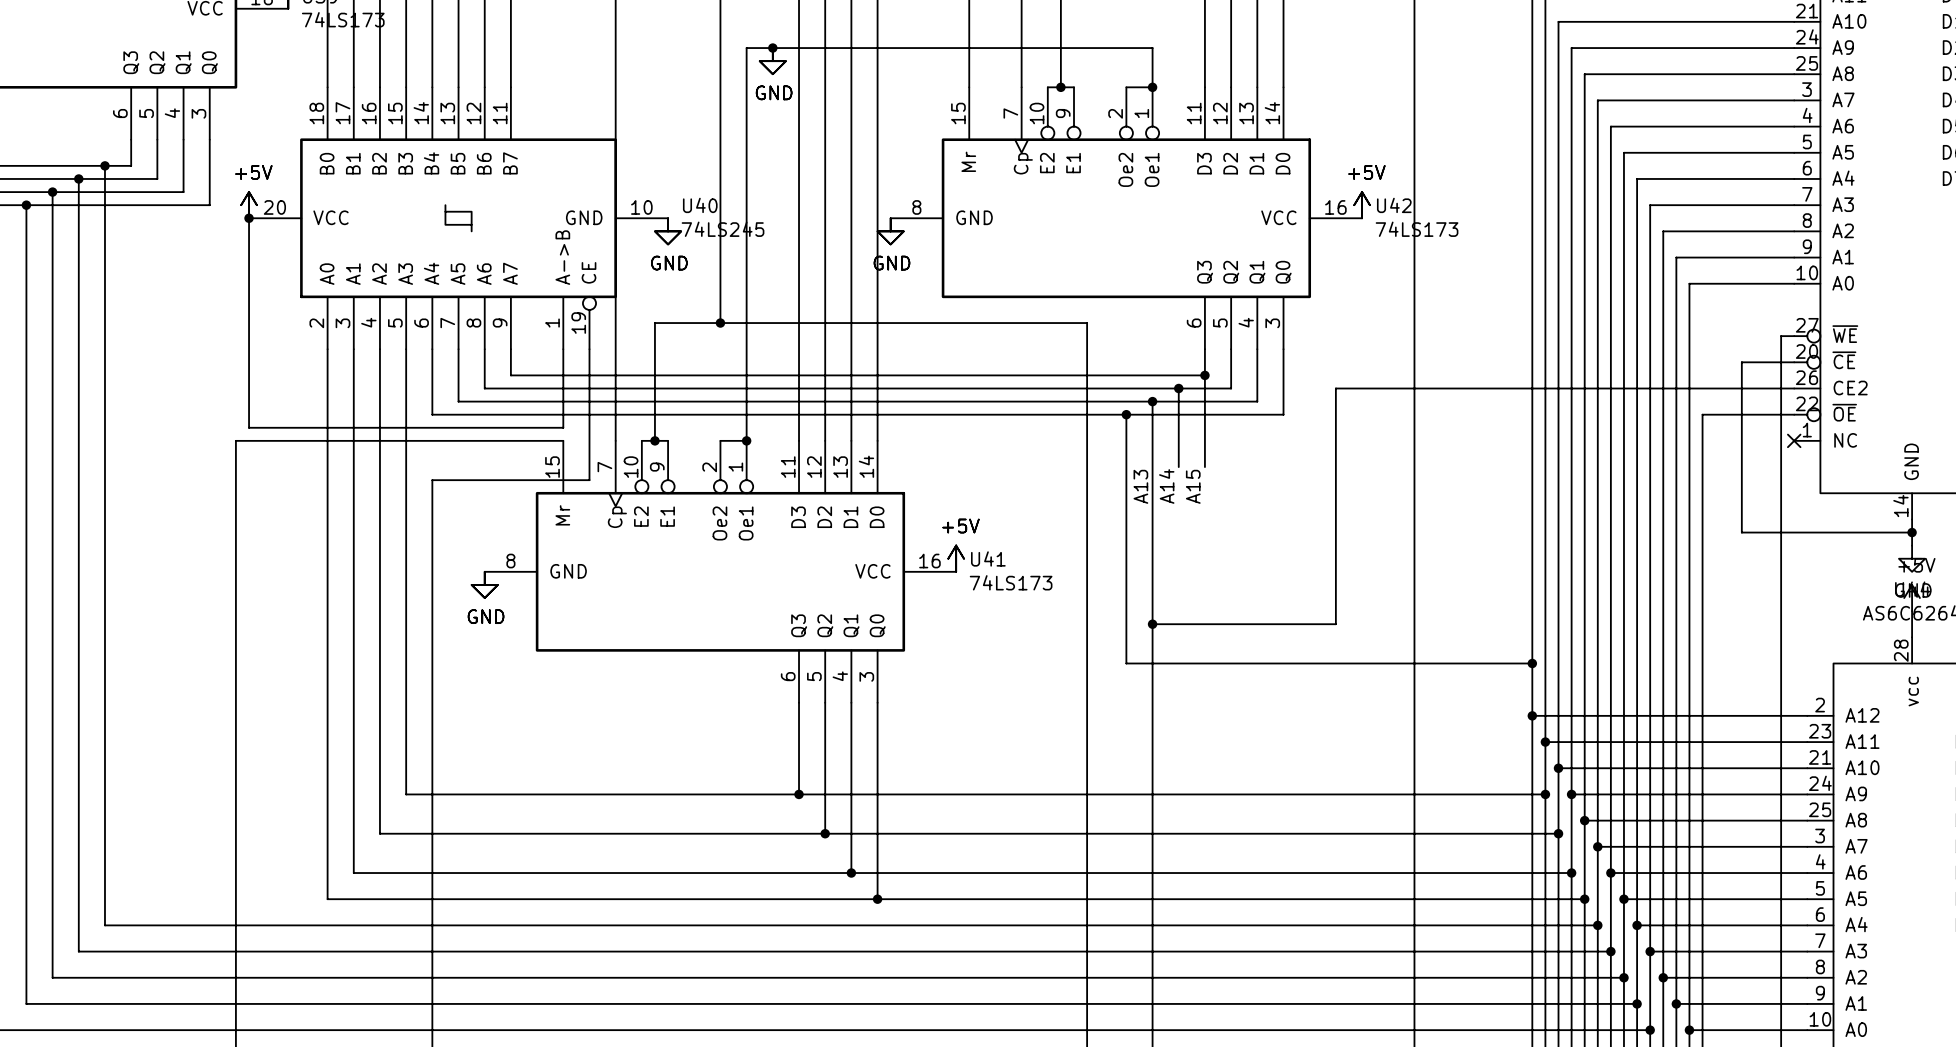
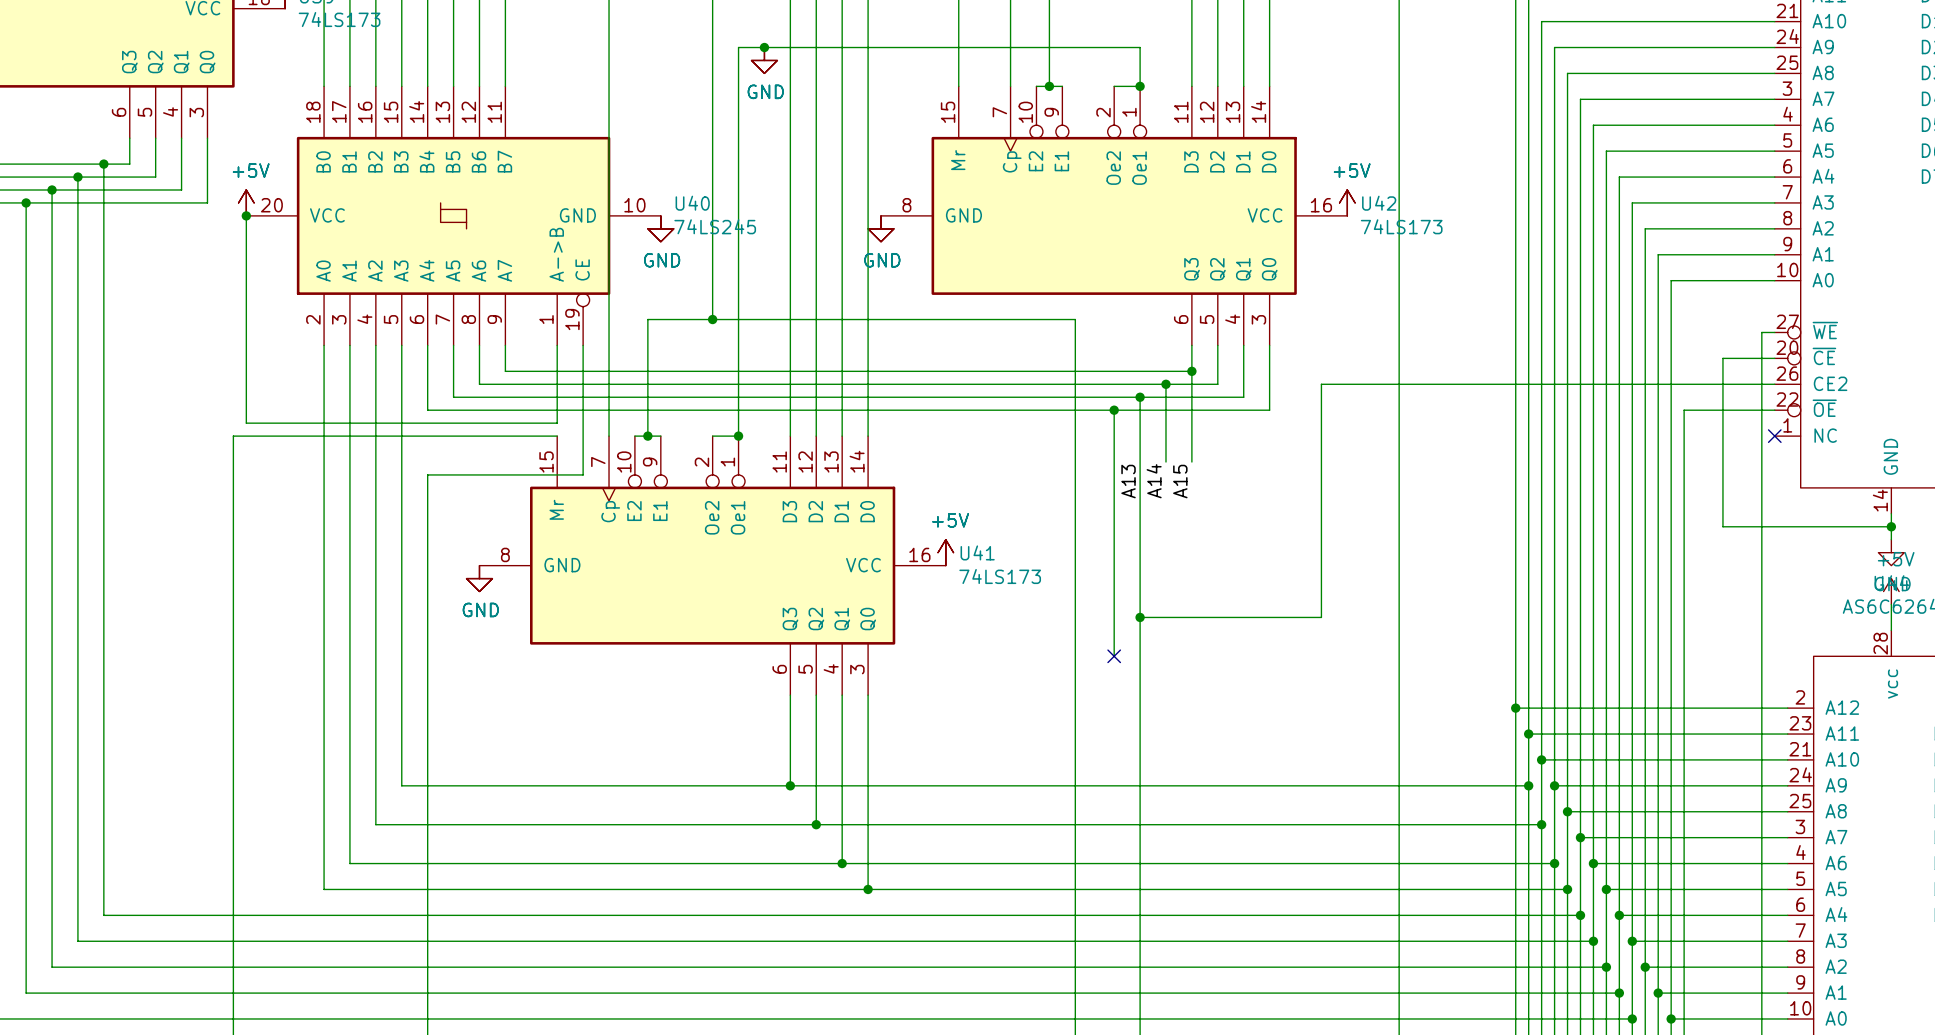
wire: (1126, 663) (1532, 663) -> none
no-connect mark: none -> (1114, 656)
junction: (1532, 663) -> none

